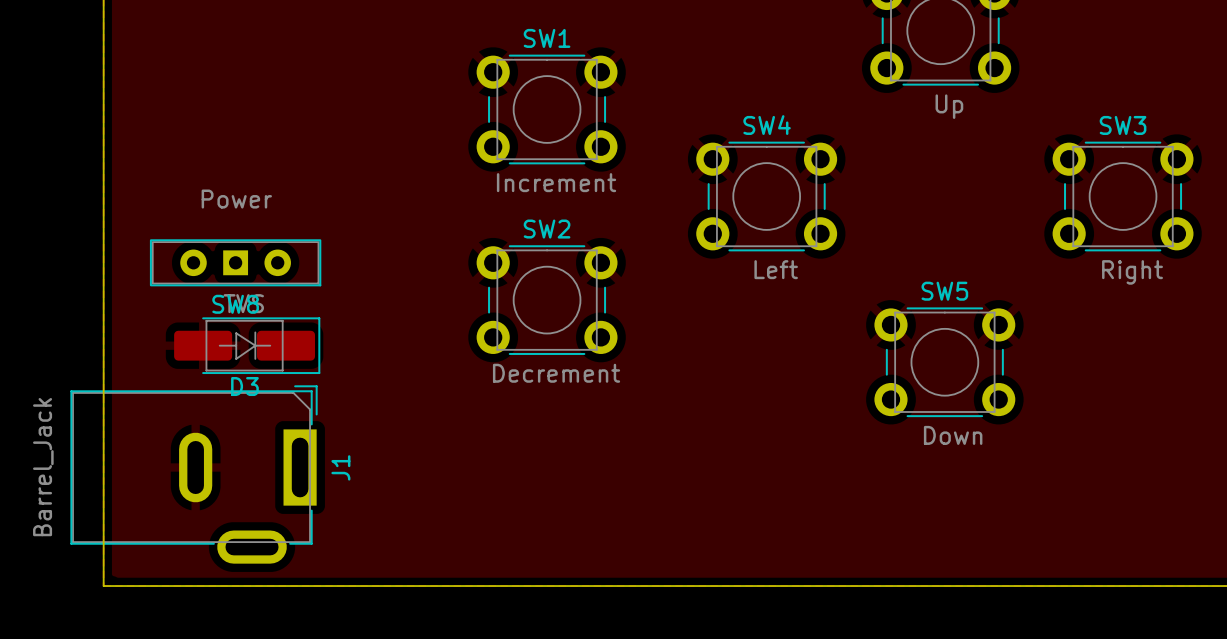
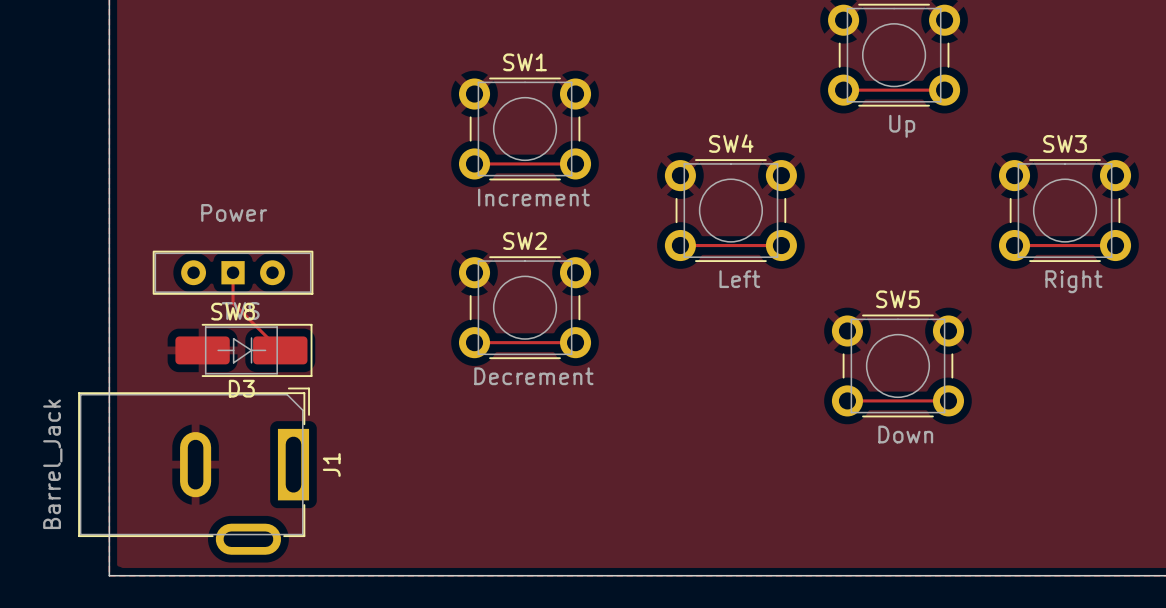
track: none -> (843, 90) (944, 90)
track: none -> (474, 163) (575, 163)
track: none -> (680, 245) (781, 245)
track: none -> (1014, 245) (1115, 245)
track: none -> (233, 272) (233, 303) (280, 350)
track: none -> (474, 342) (575, 342)
track: none -> (847, 400) (948, 400)

